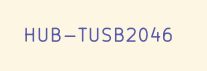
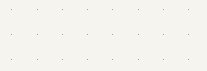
text: HUB-TUSB2046 (98, 34) -> none

